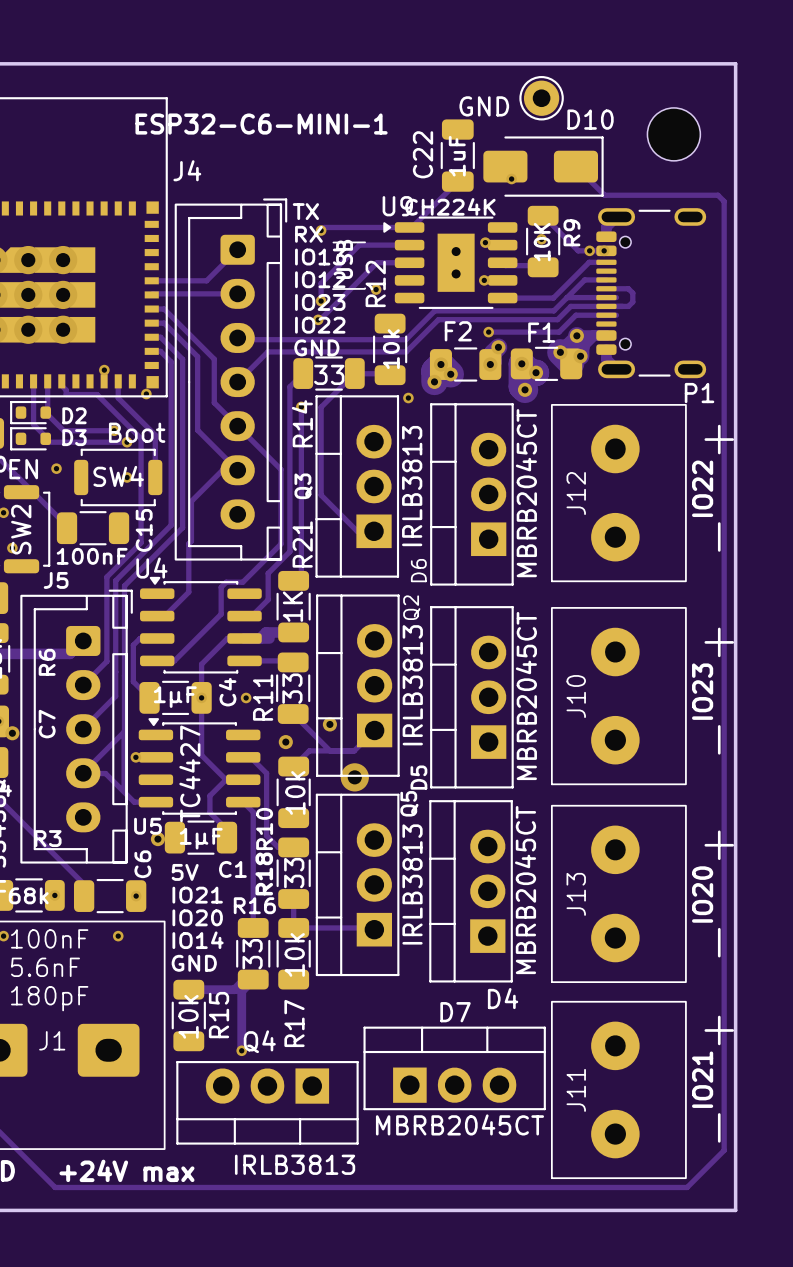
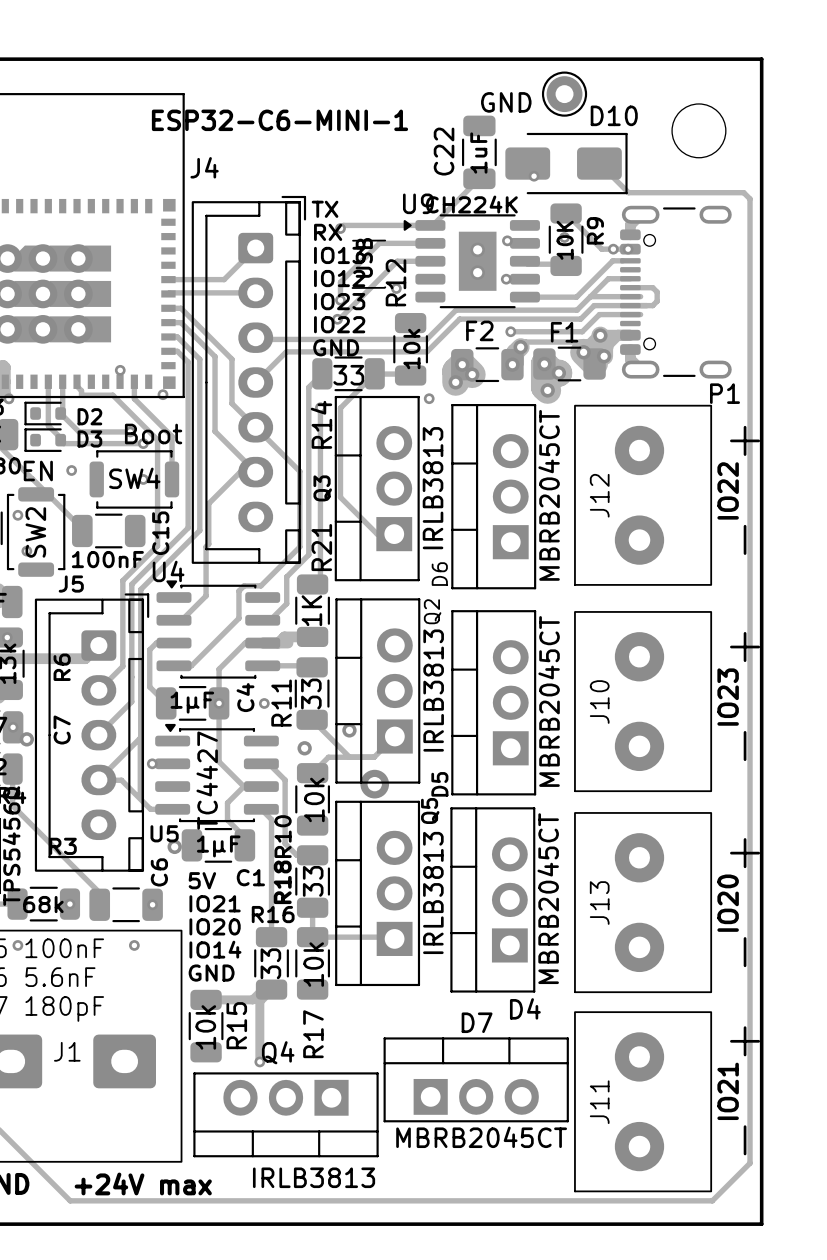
track: none -> (600, 335) (593, 342) (525, 342) (520, 347)

